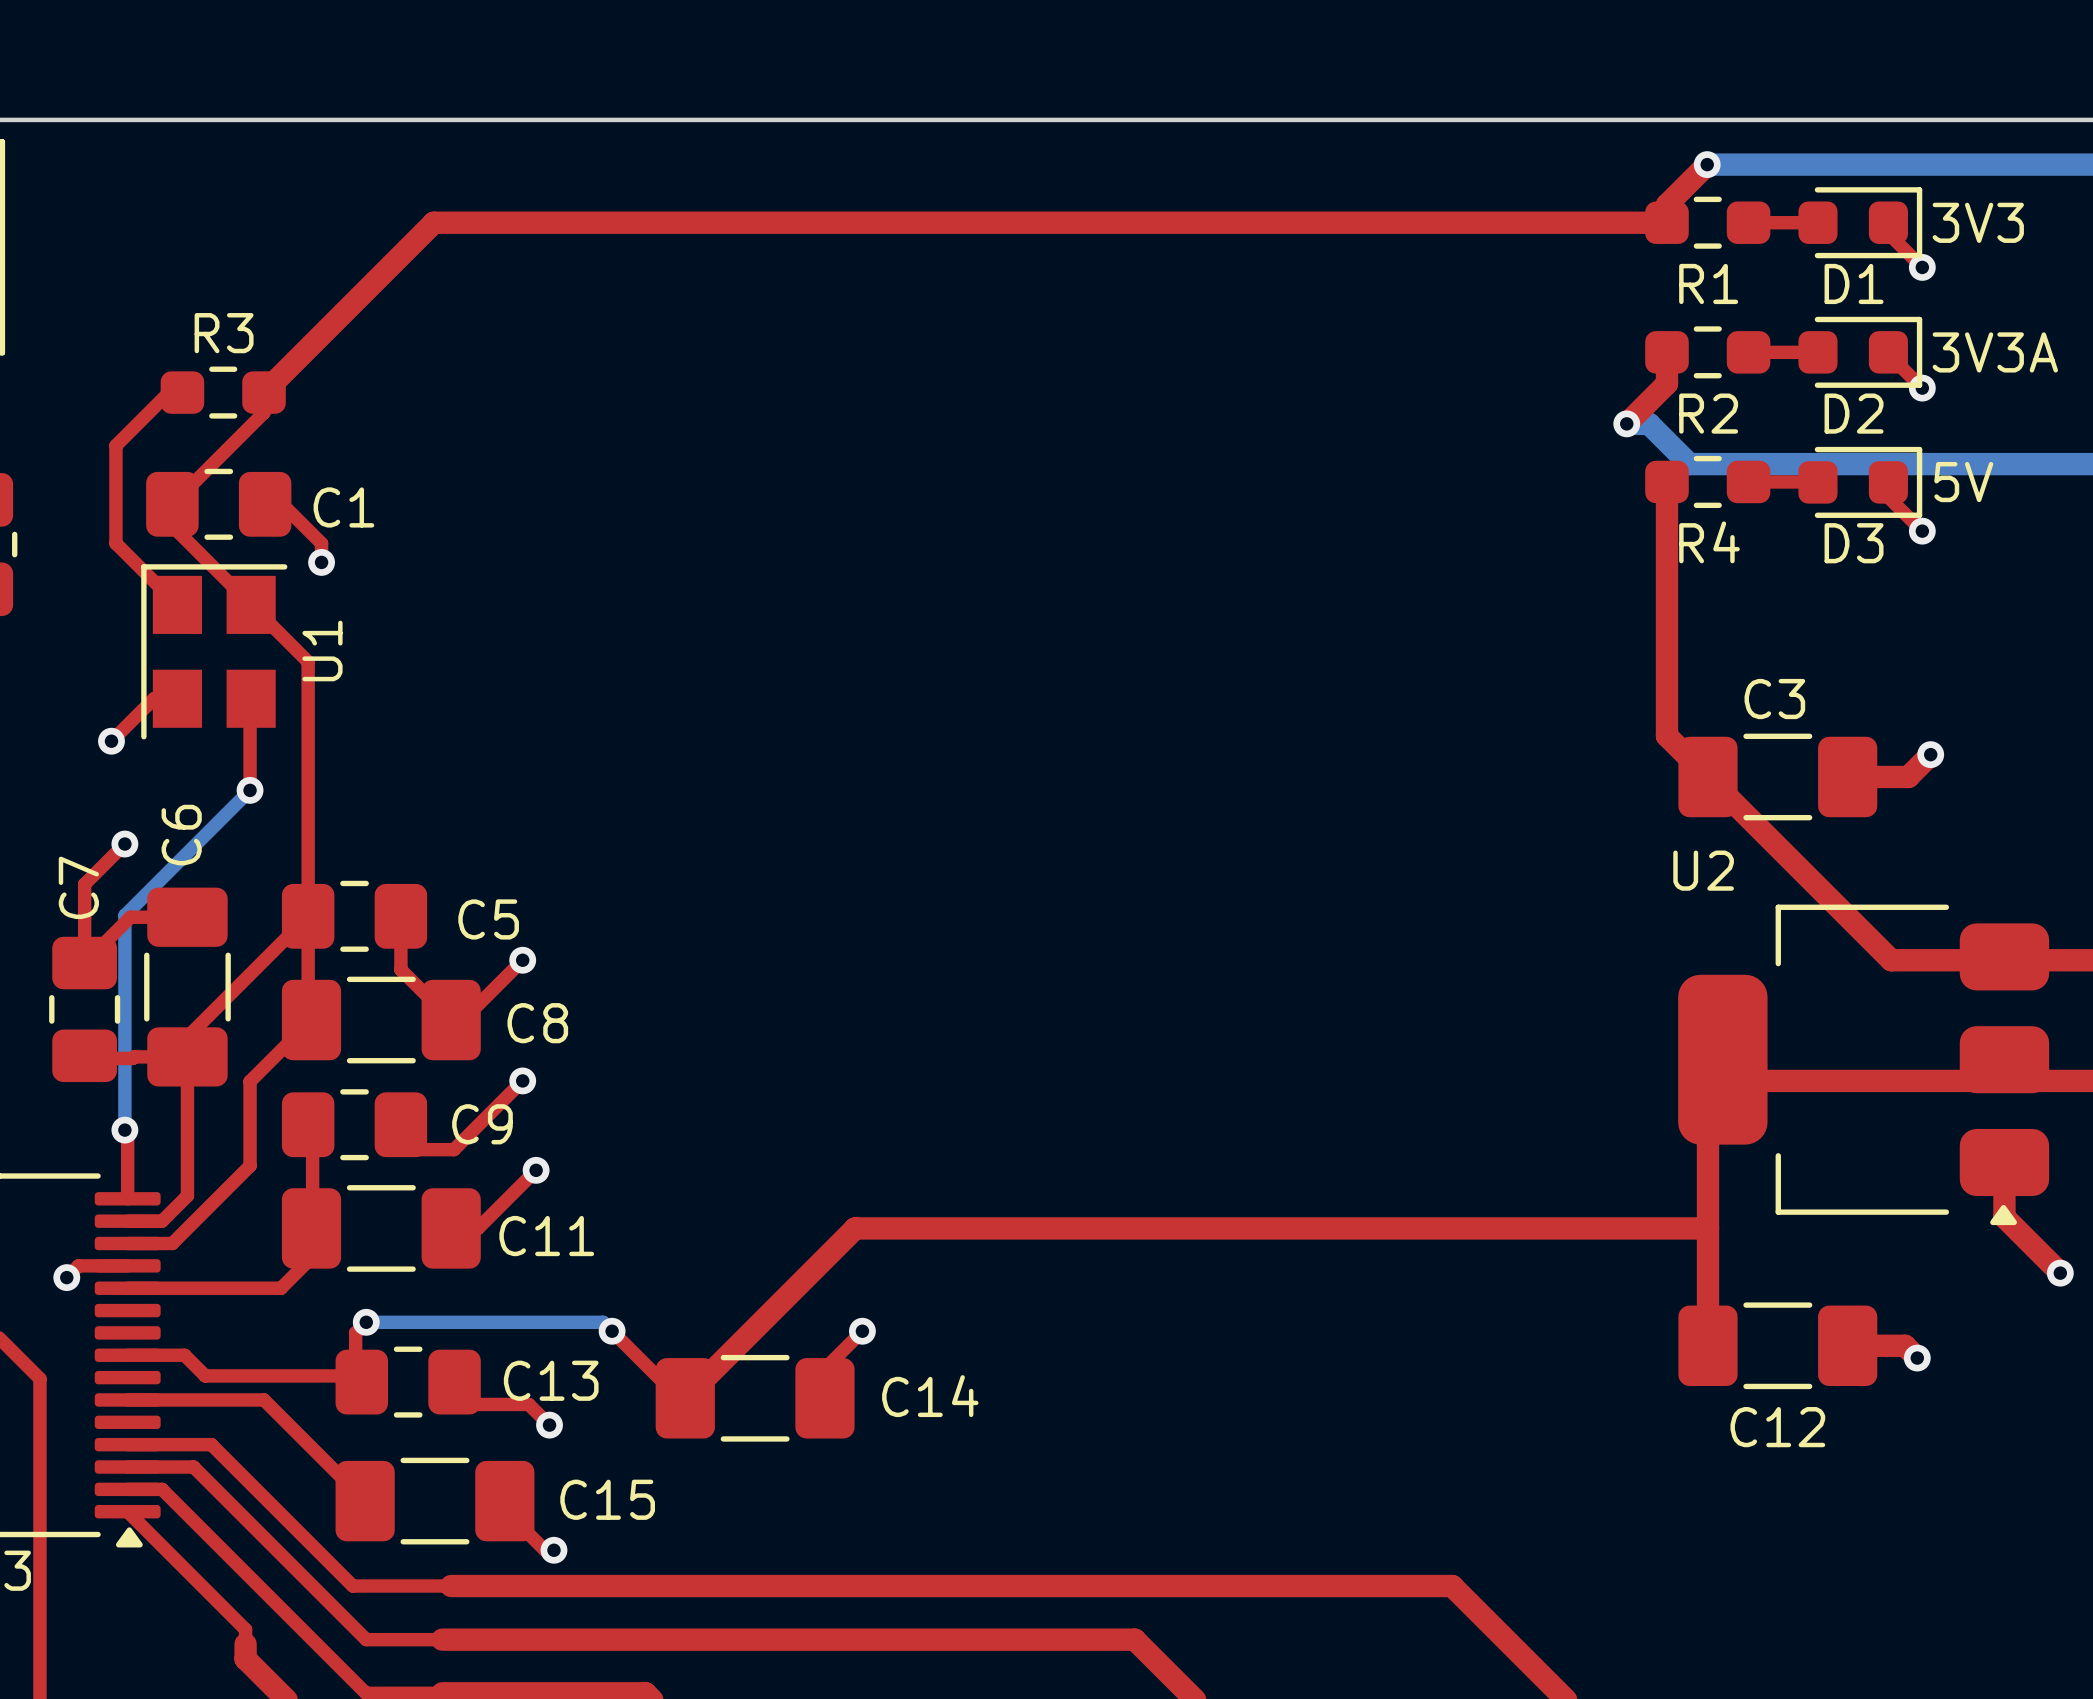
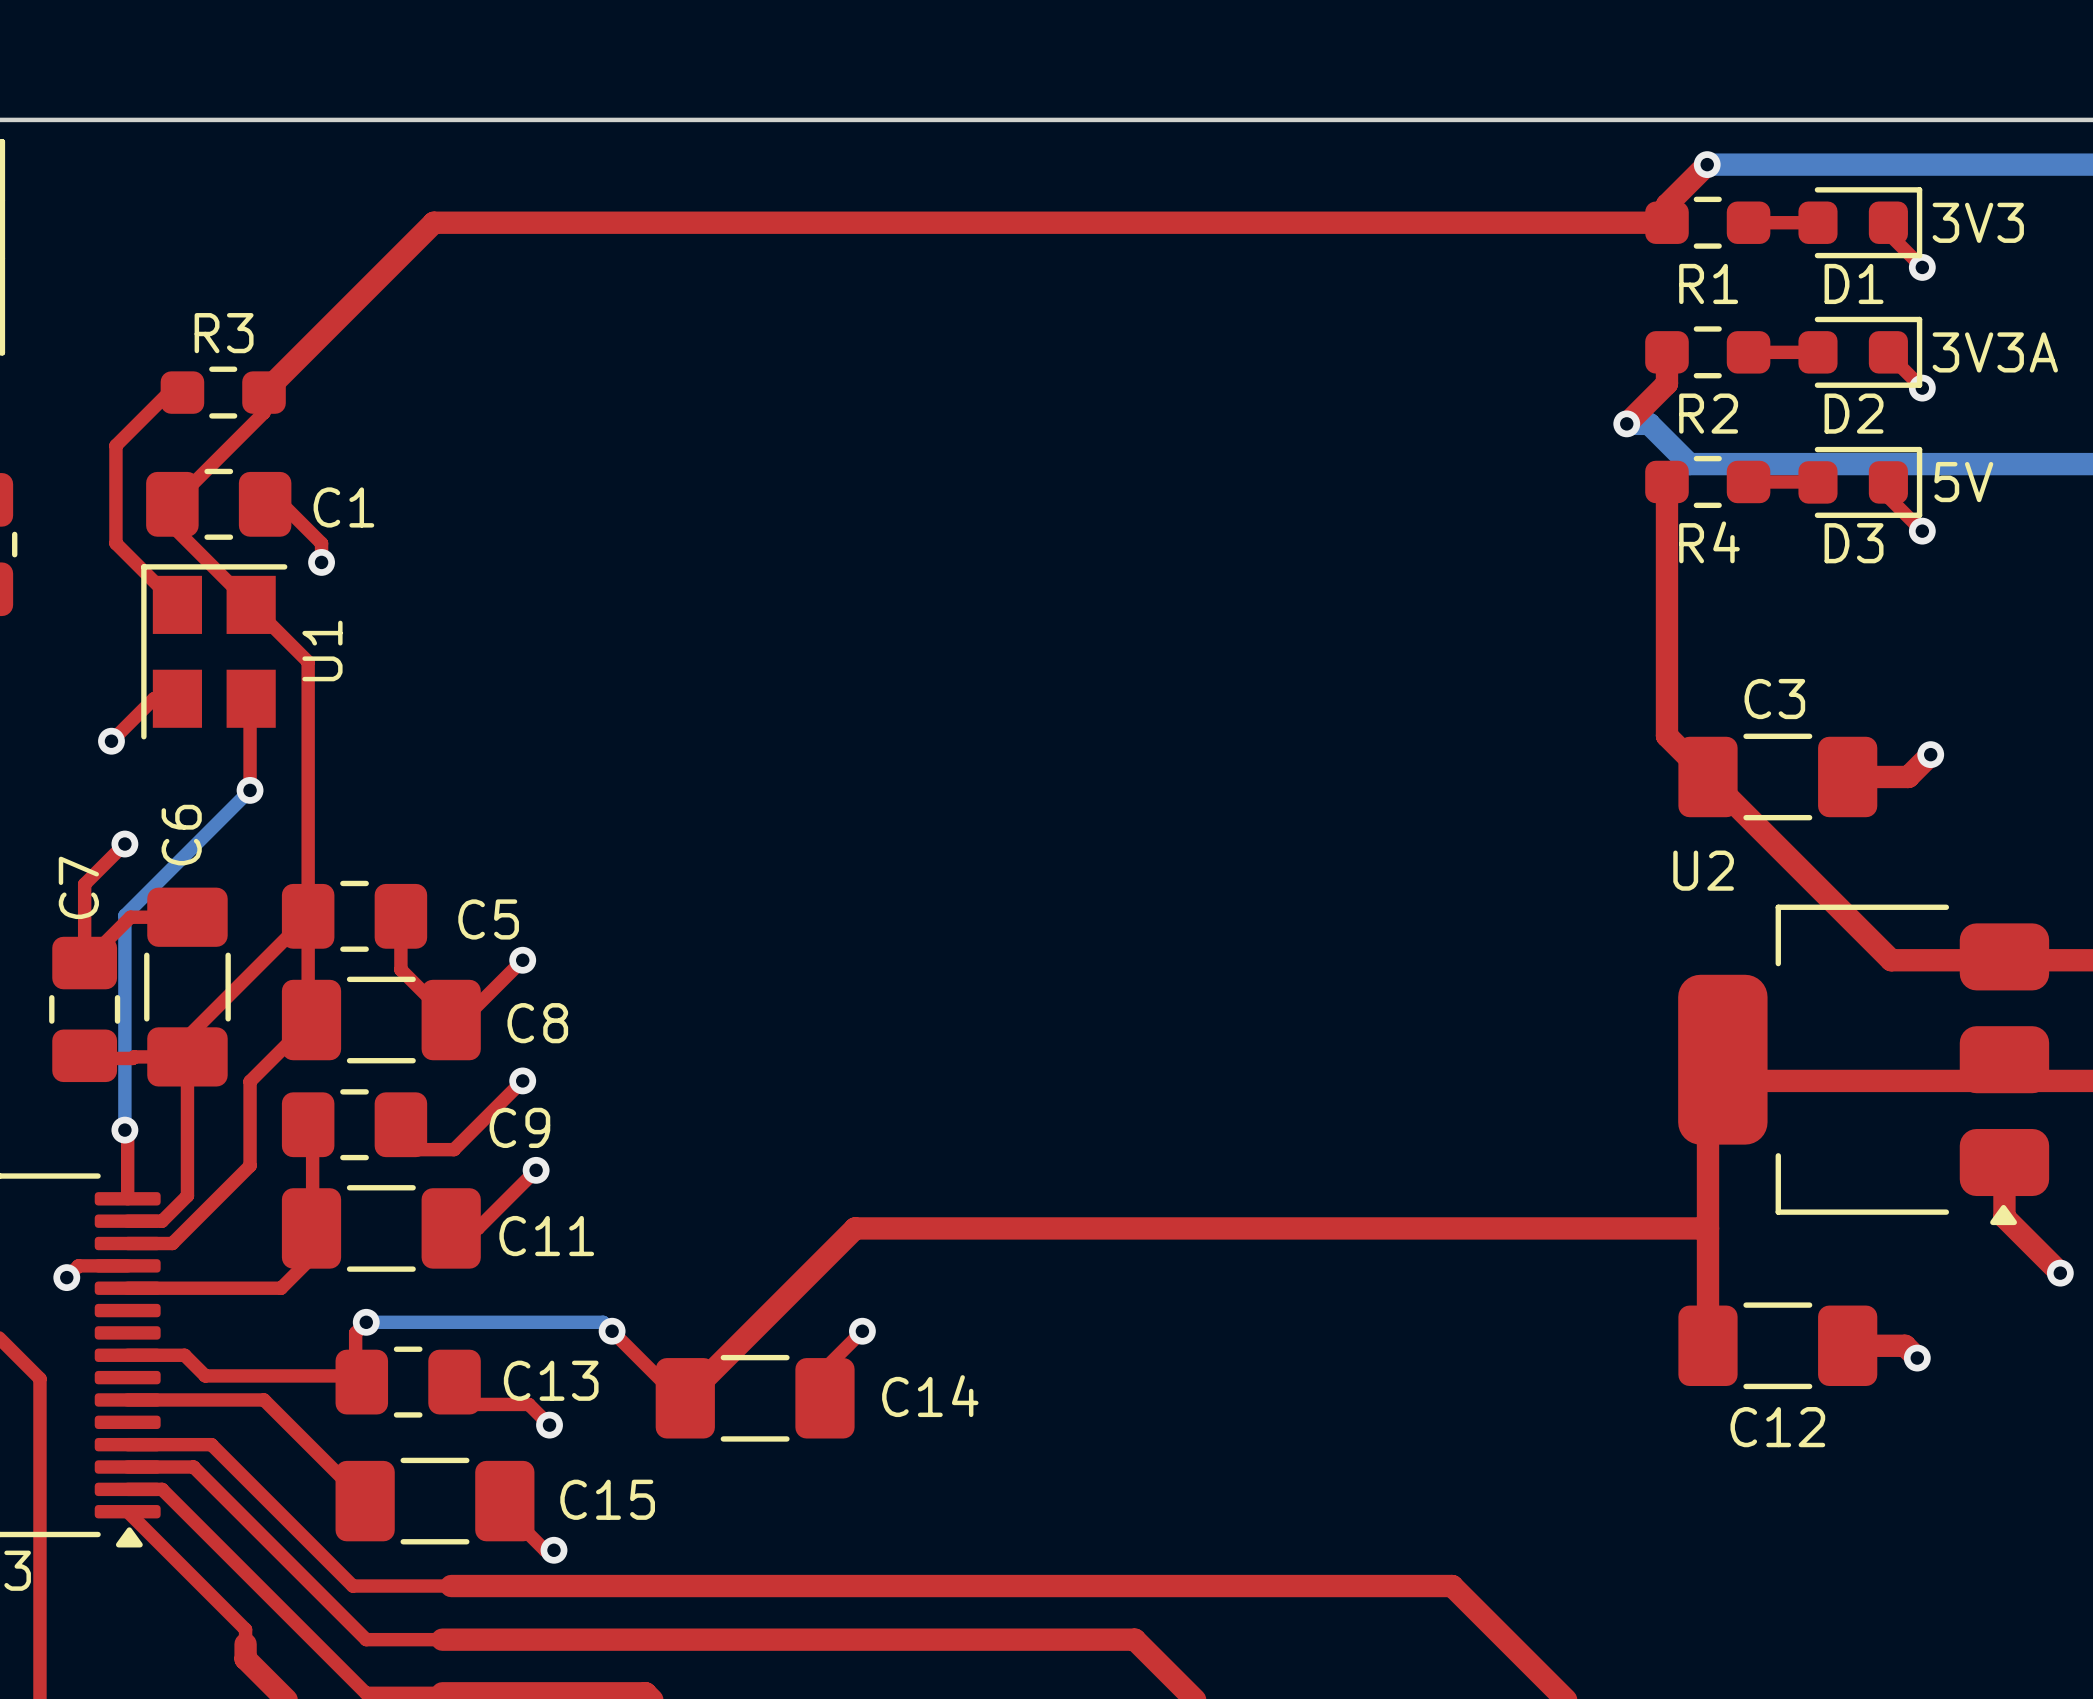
C9 name position: C9 (482, 1124) -> C9 (519, 1127)

